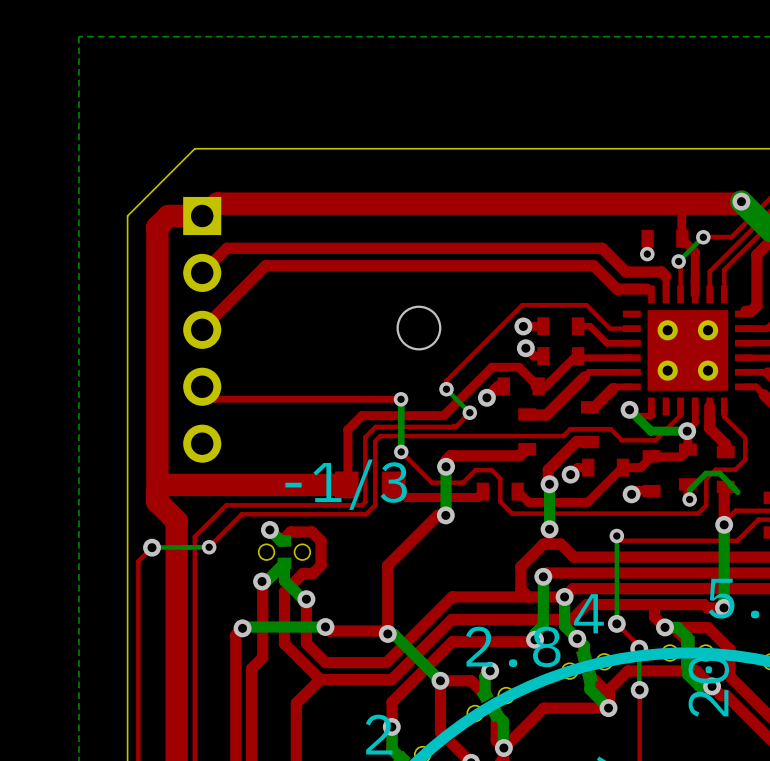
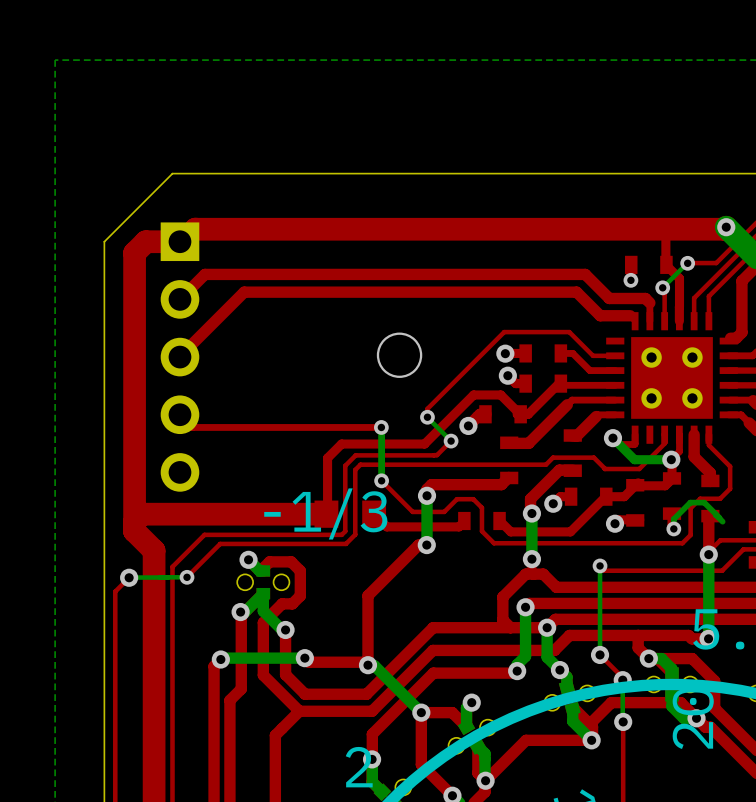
text: 4 (588, 613) -> none
text: 2.8 (513, 646) -> none

